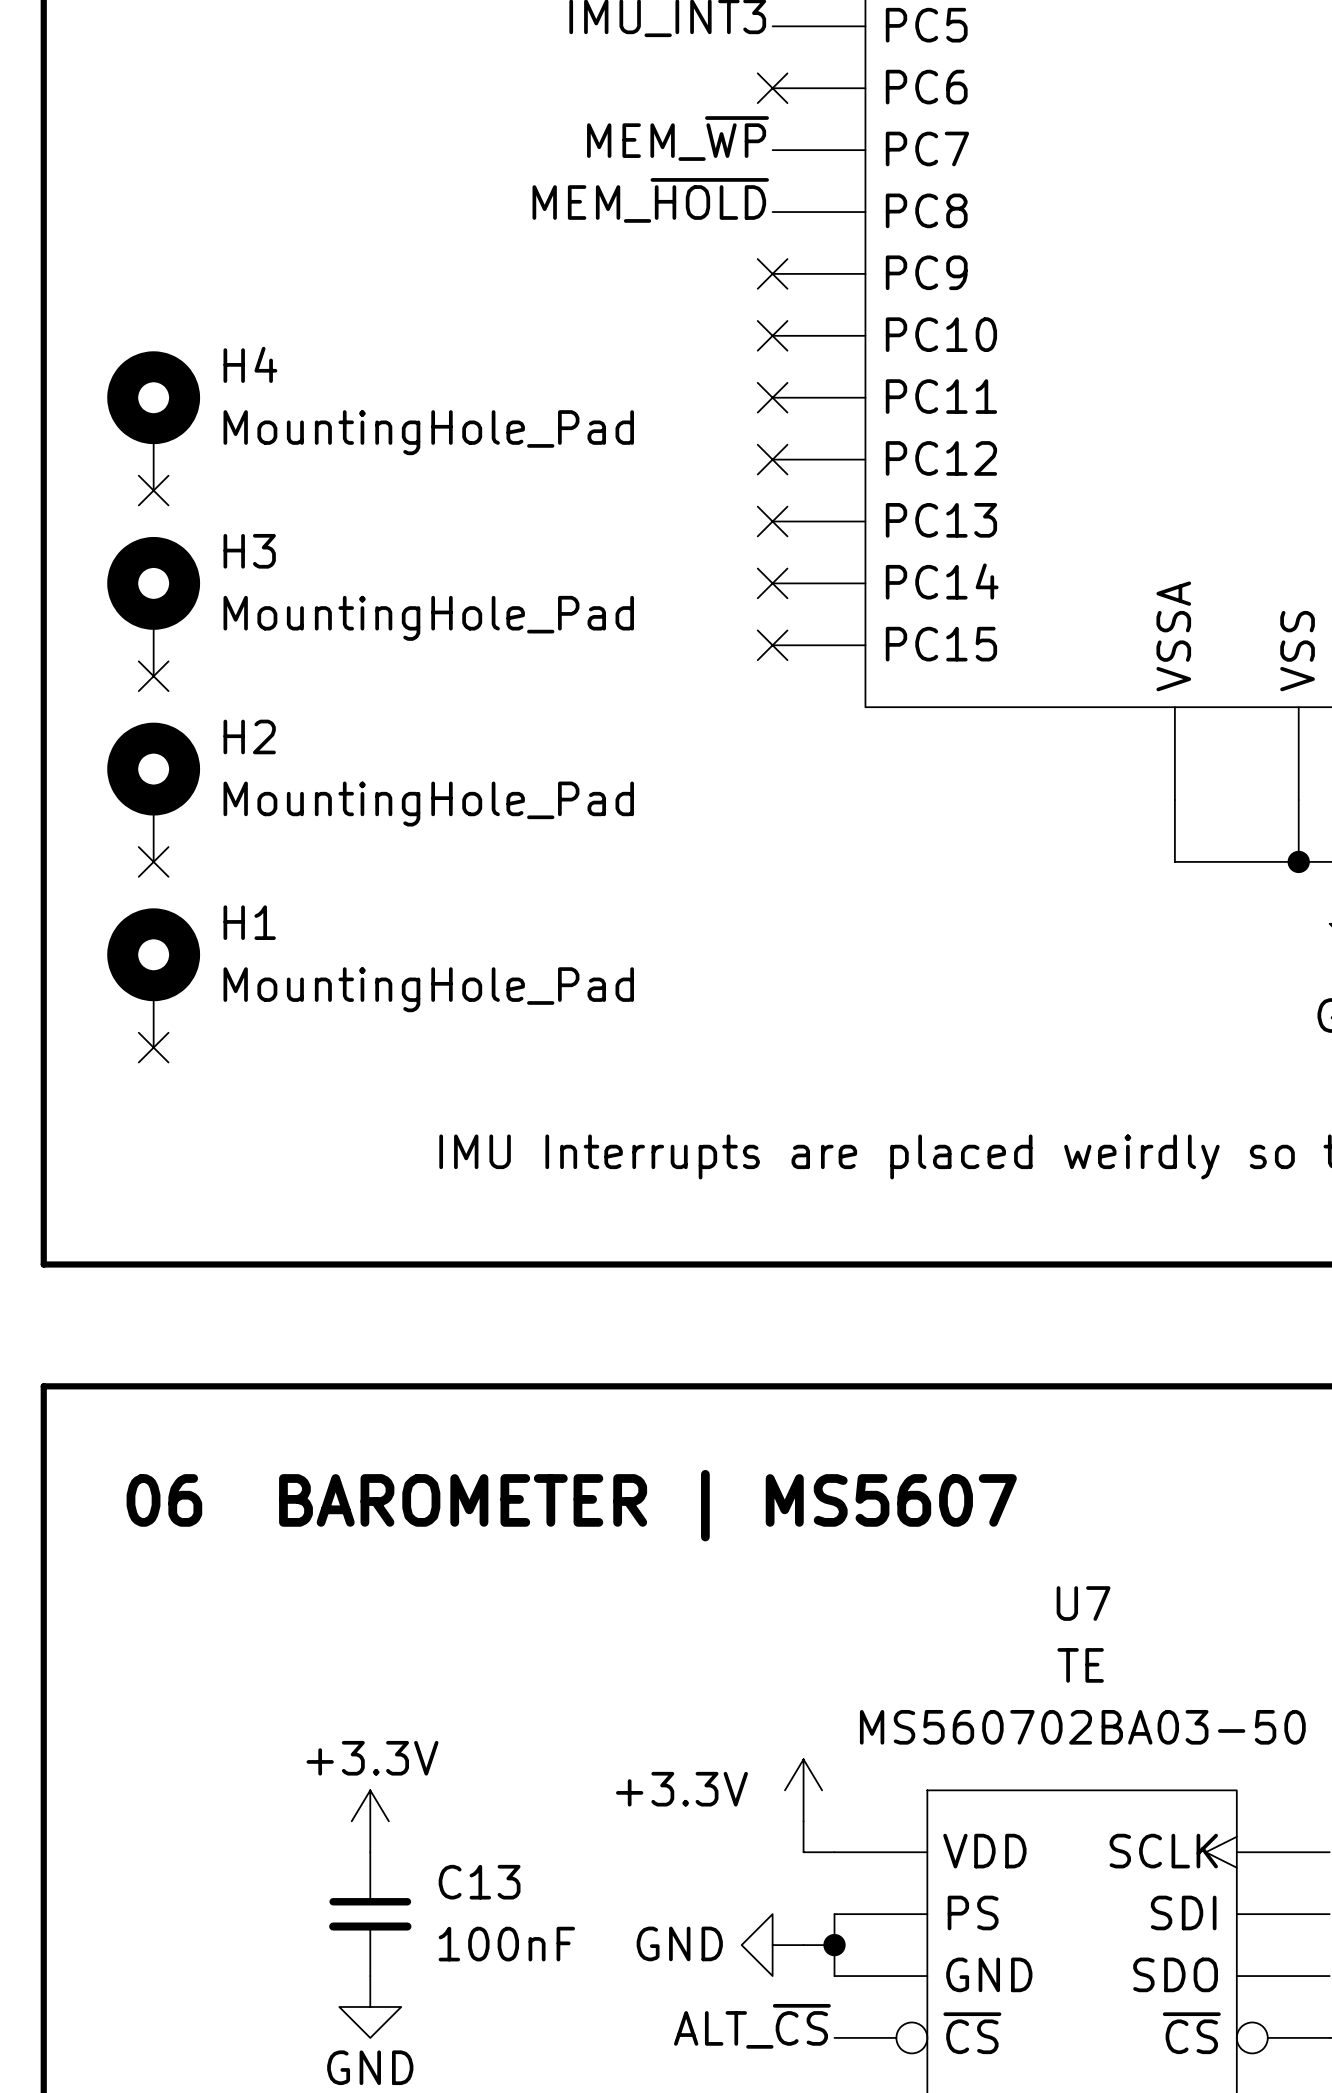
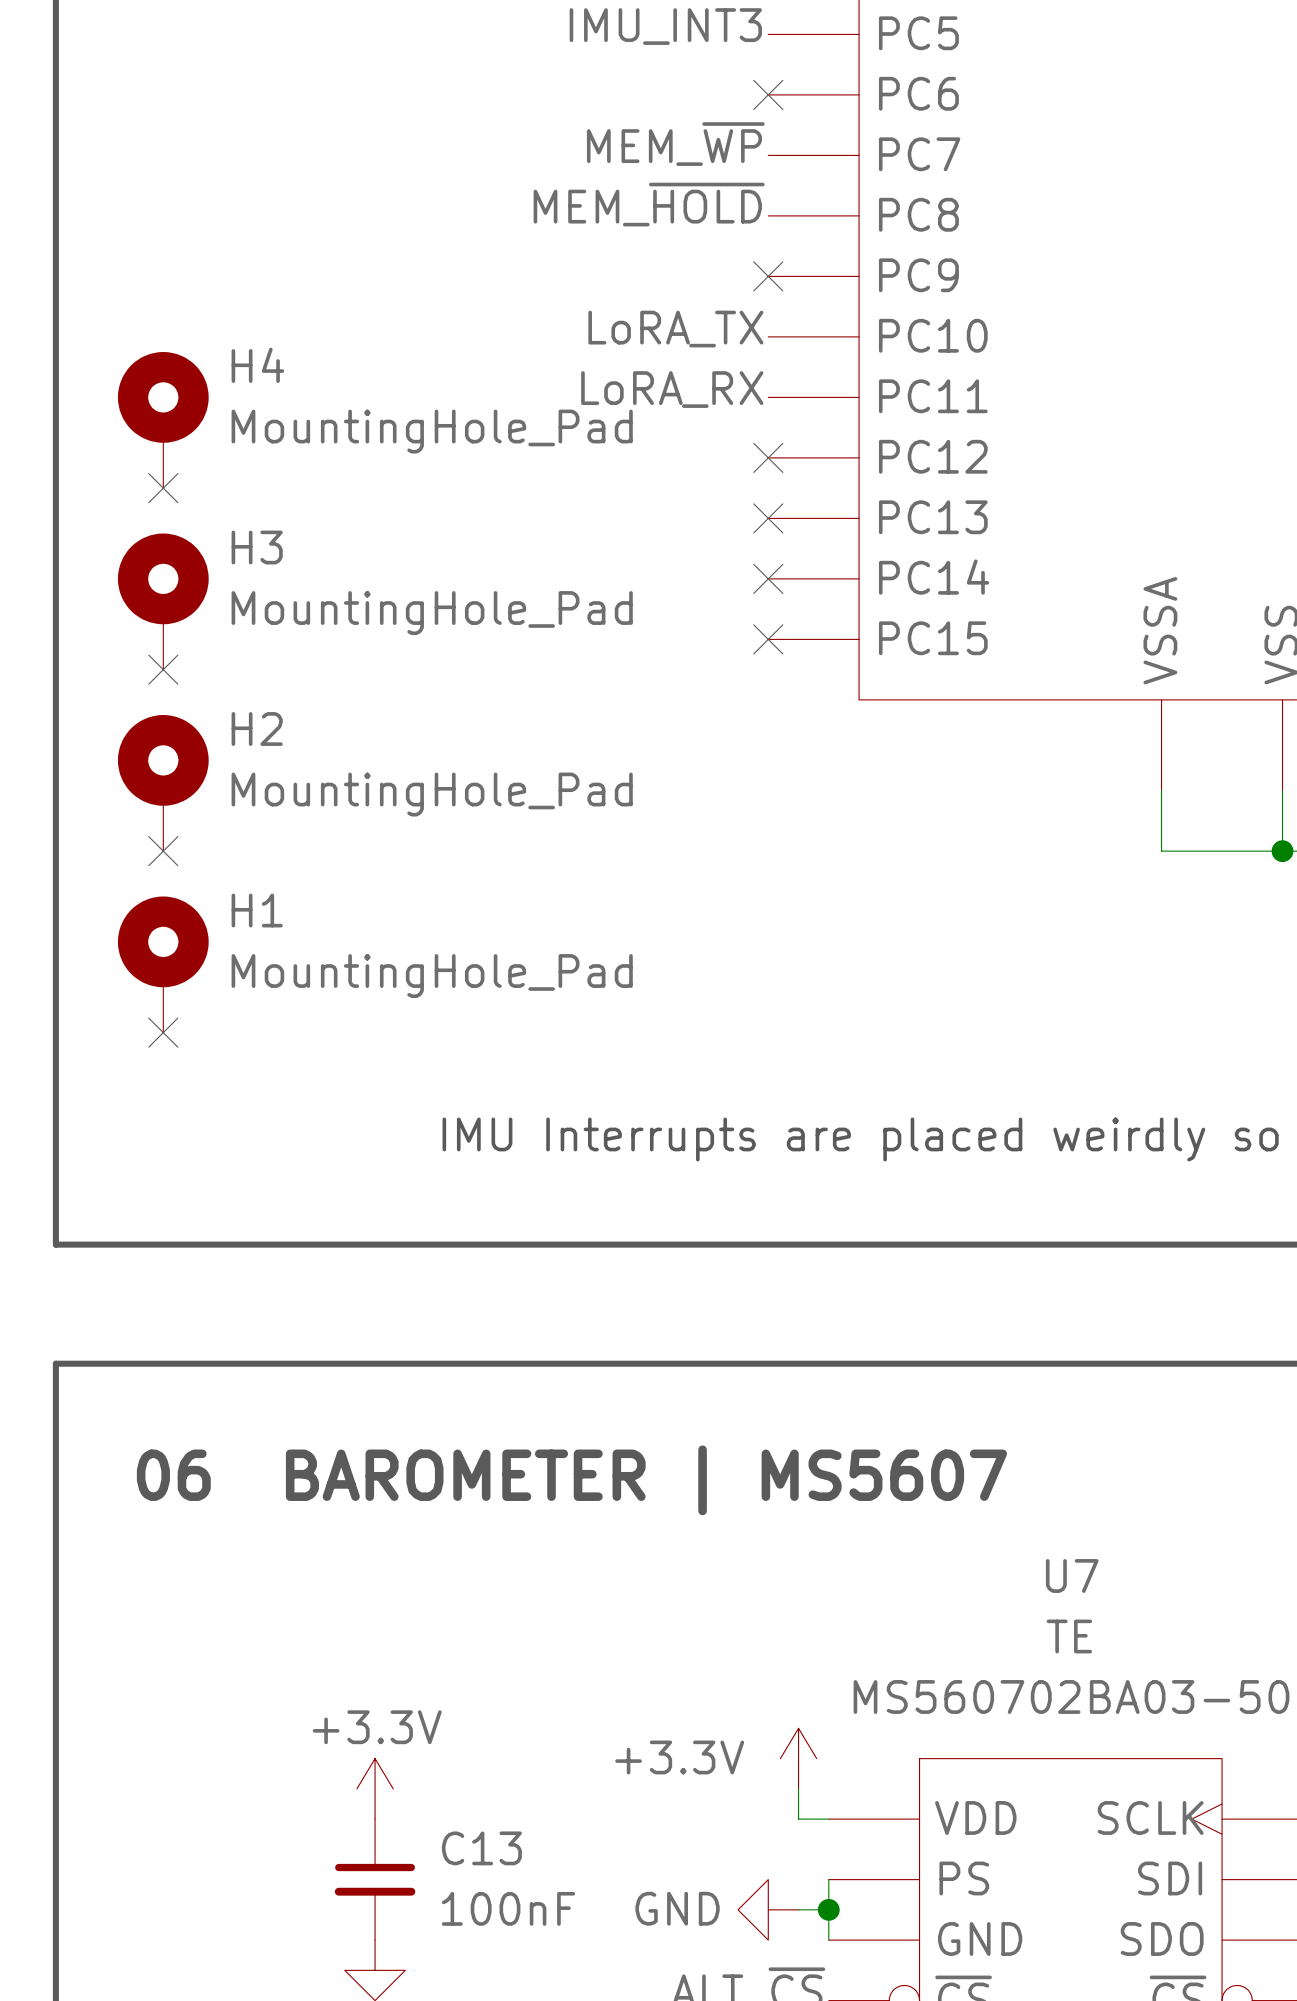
label: none -> LoRA_TX (675, 329)
no-connect mark: (772, 335) -> none
label: none -> LoRA_RX (672, 389)
no-connect mark: (772, 397) -> none

